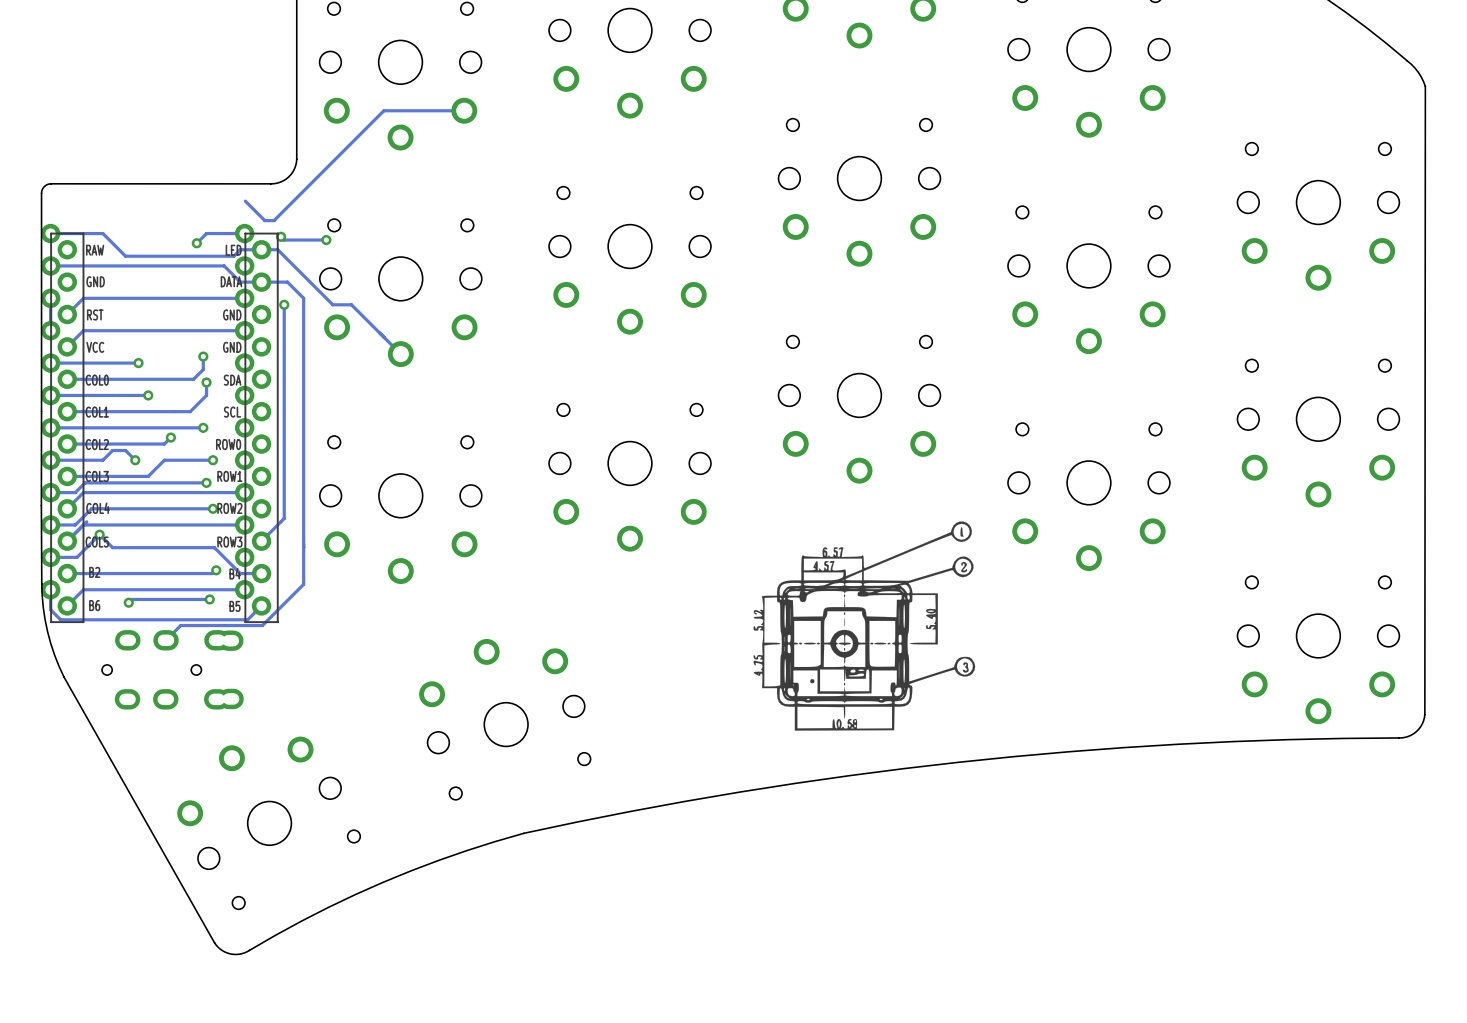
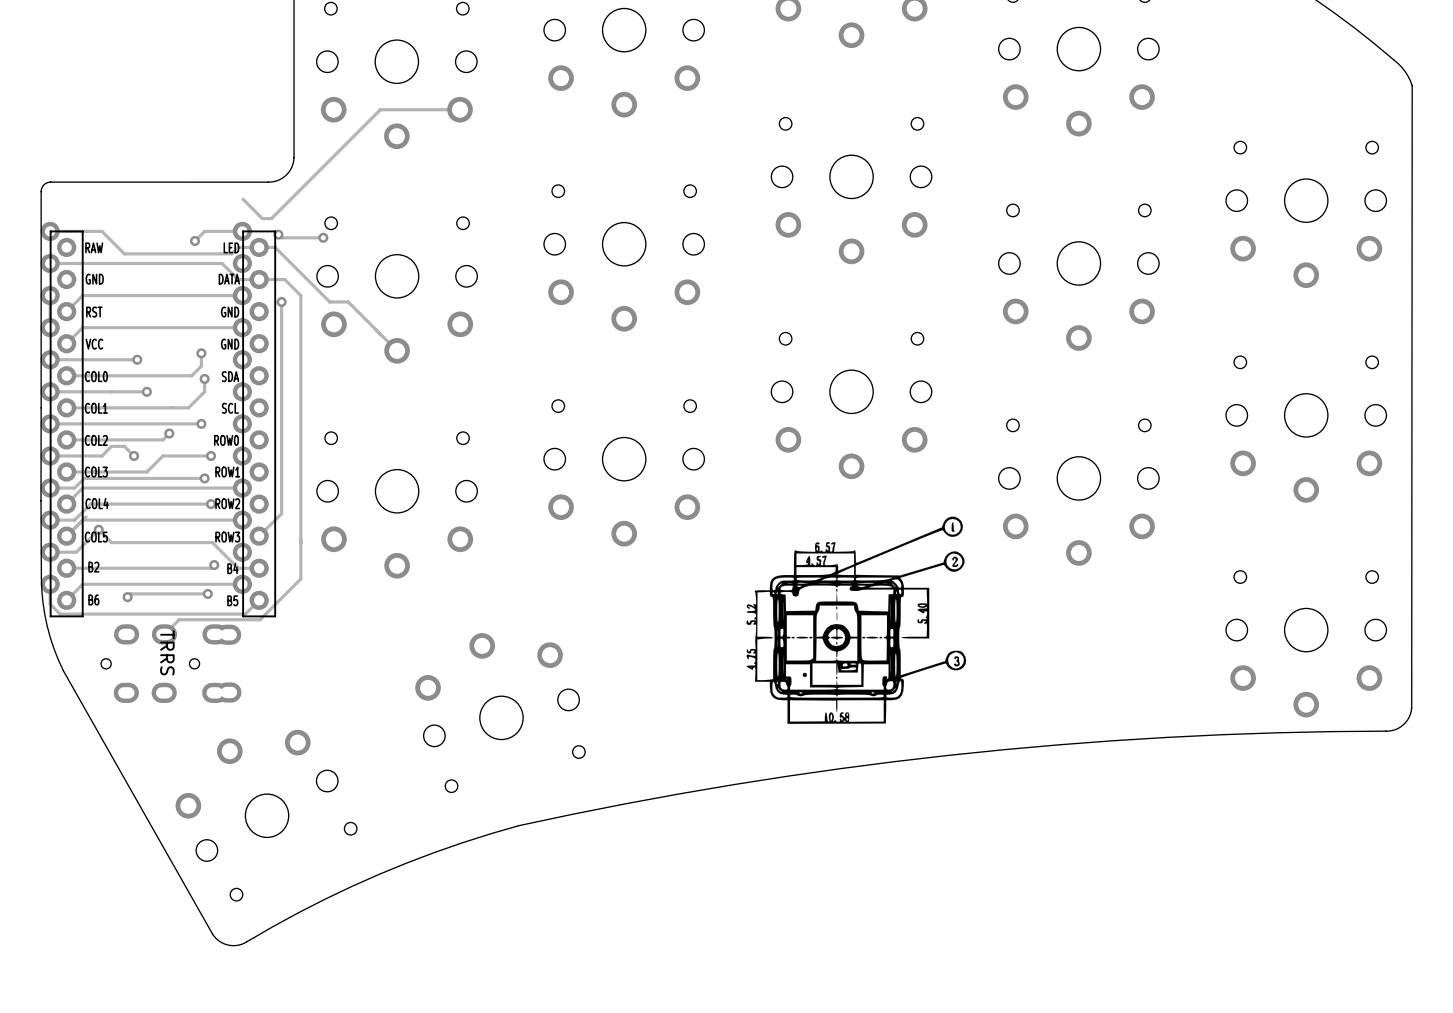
part text: none -> TRRS (167, 652)

